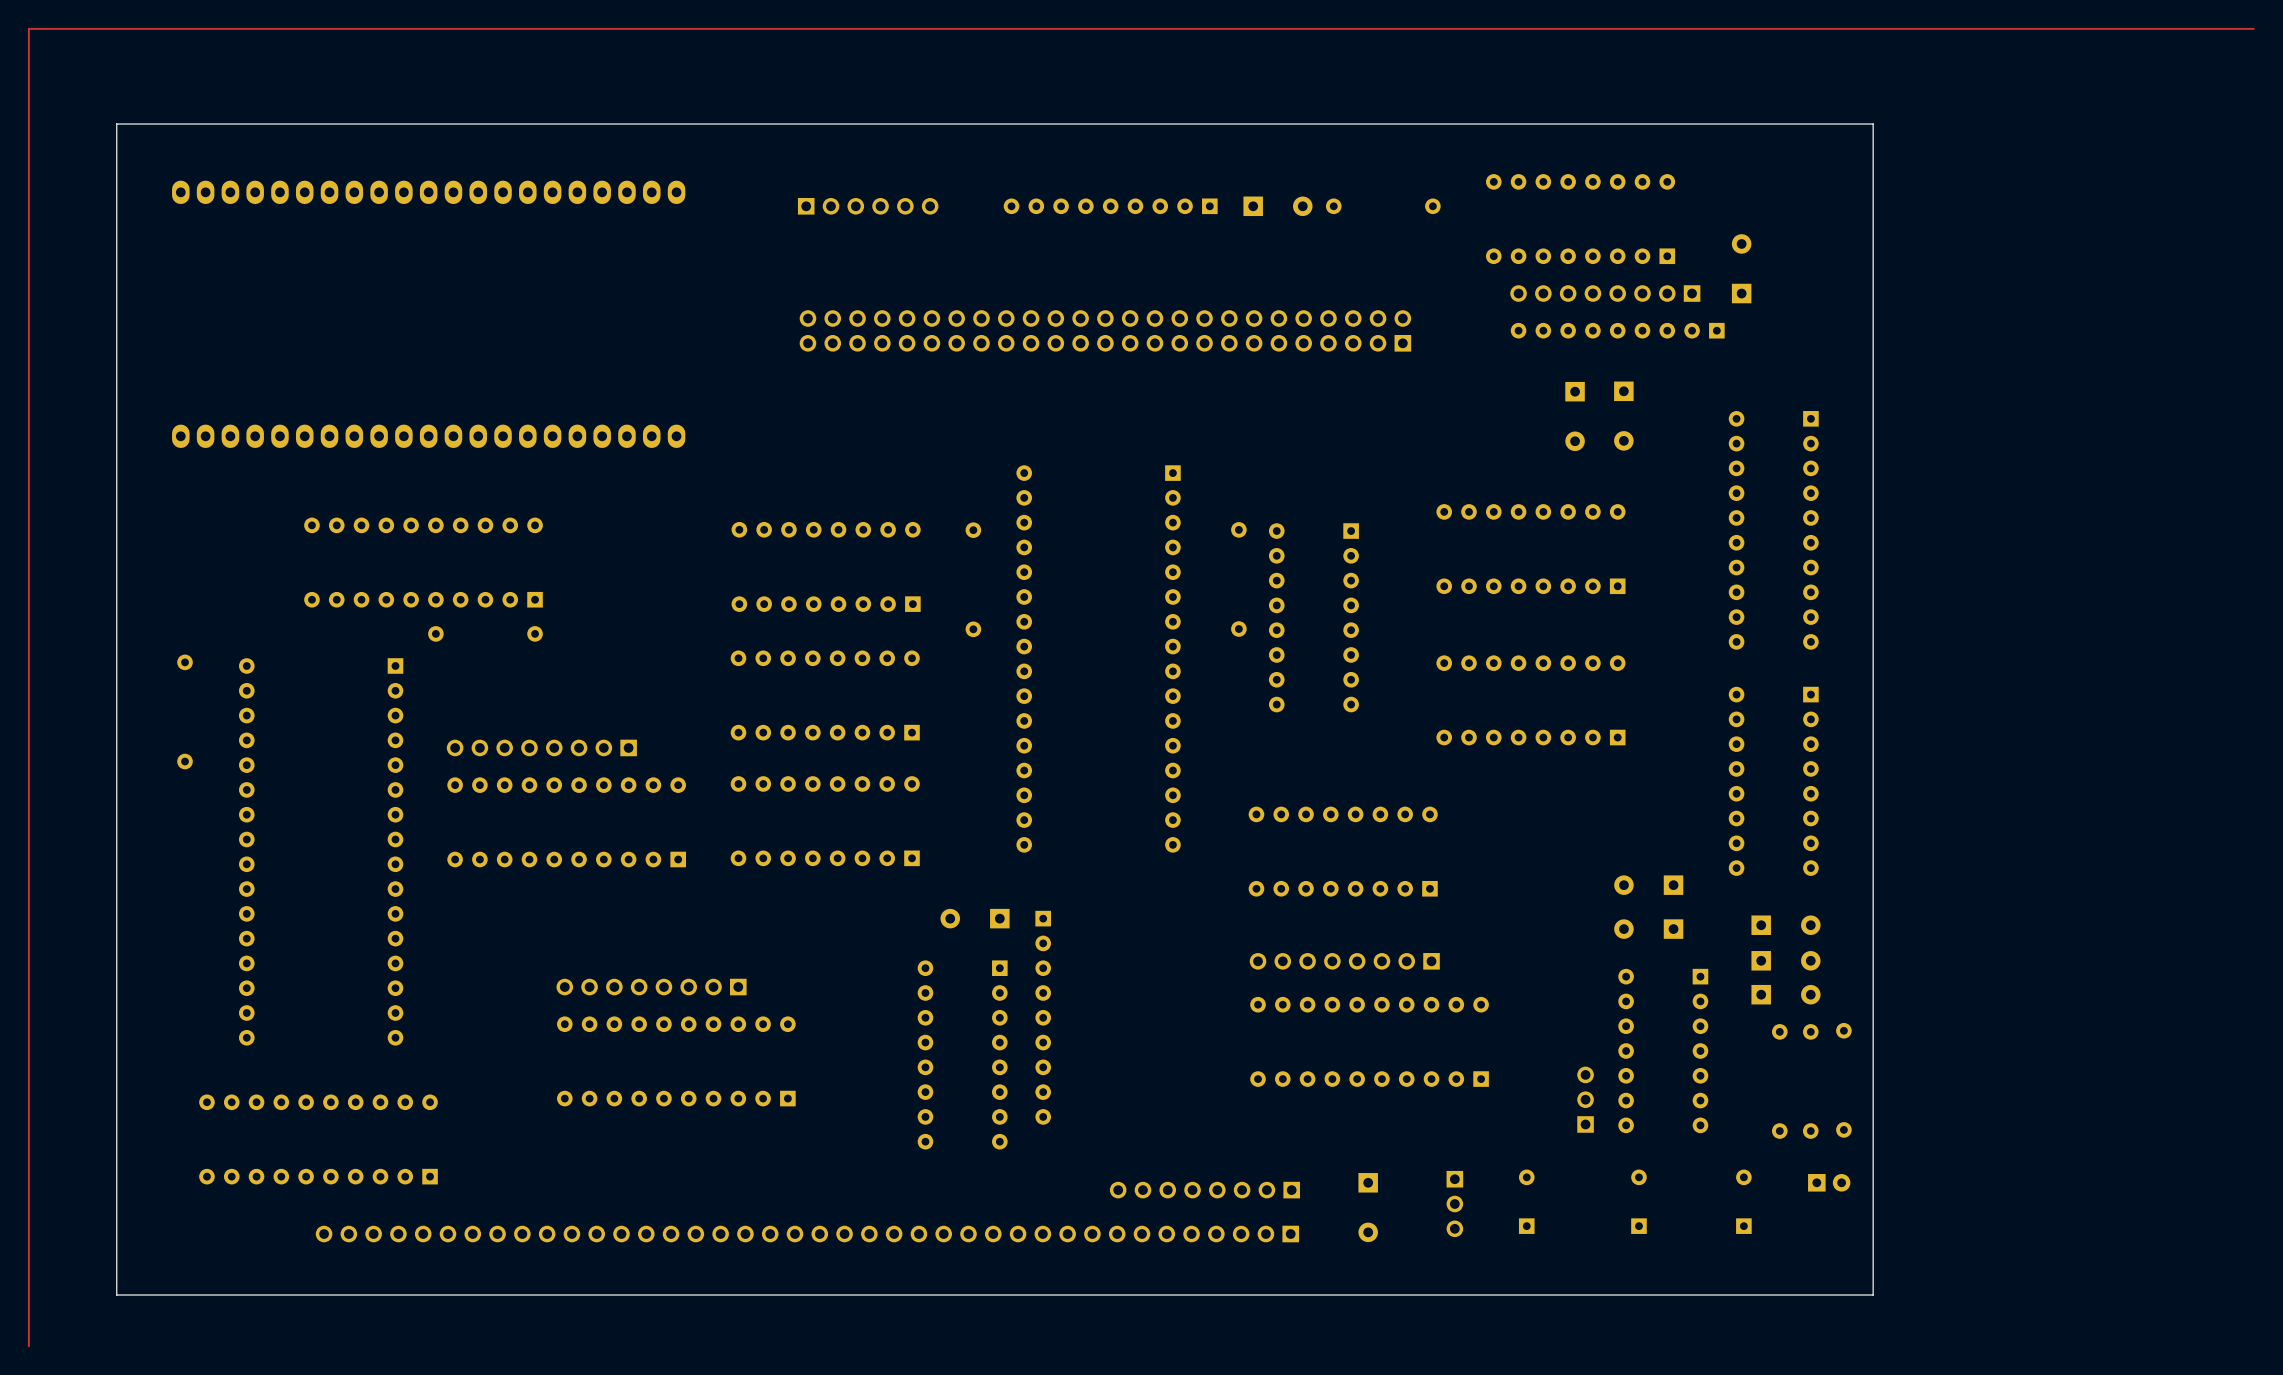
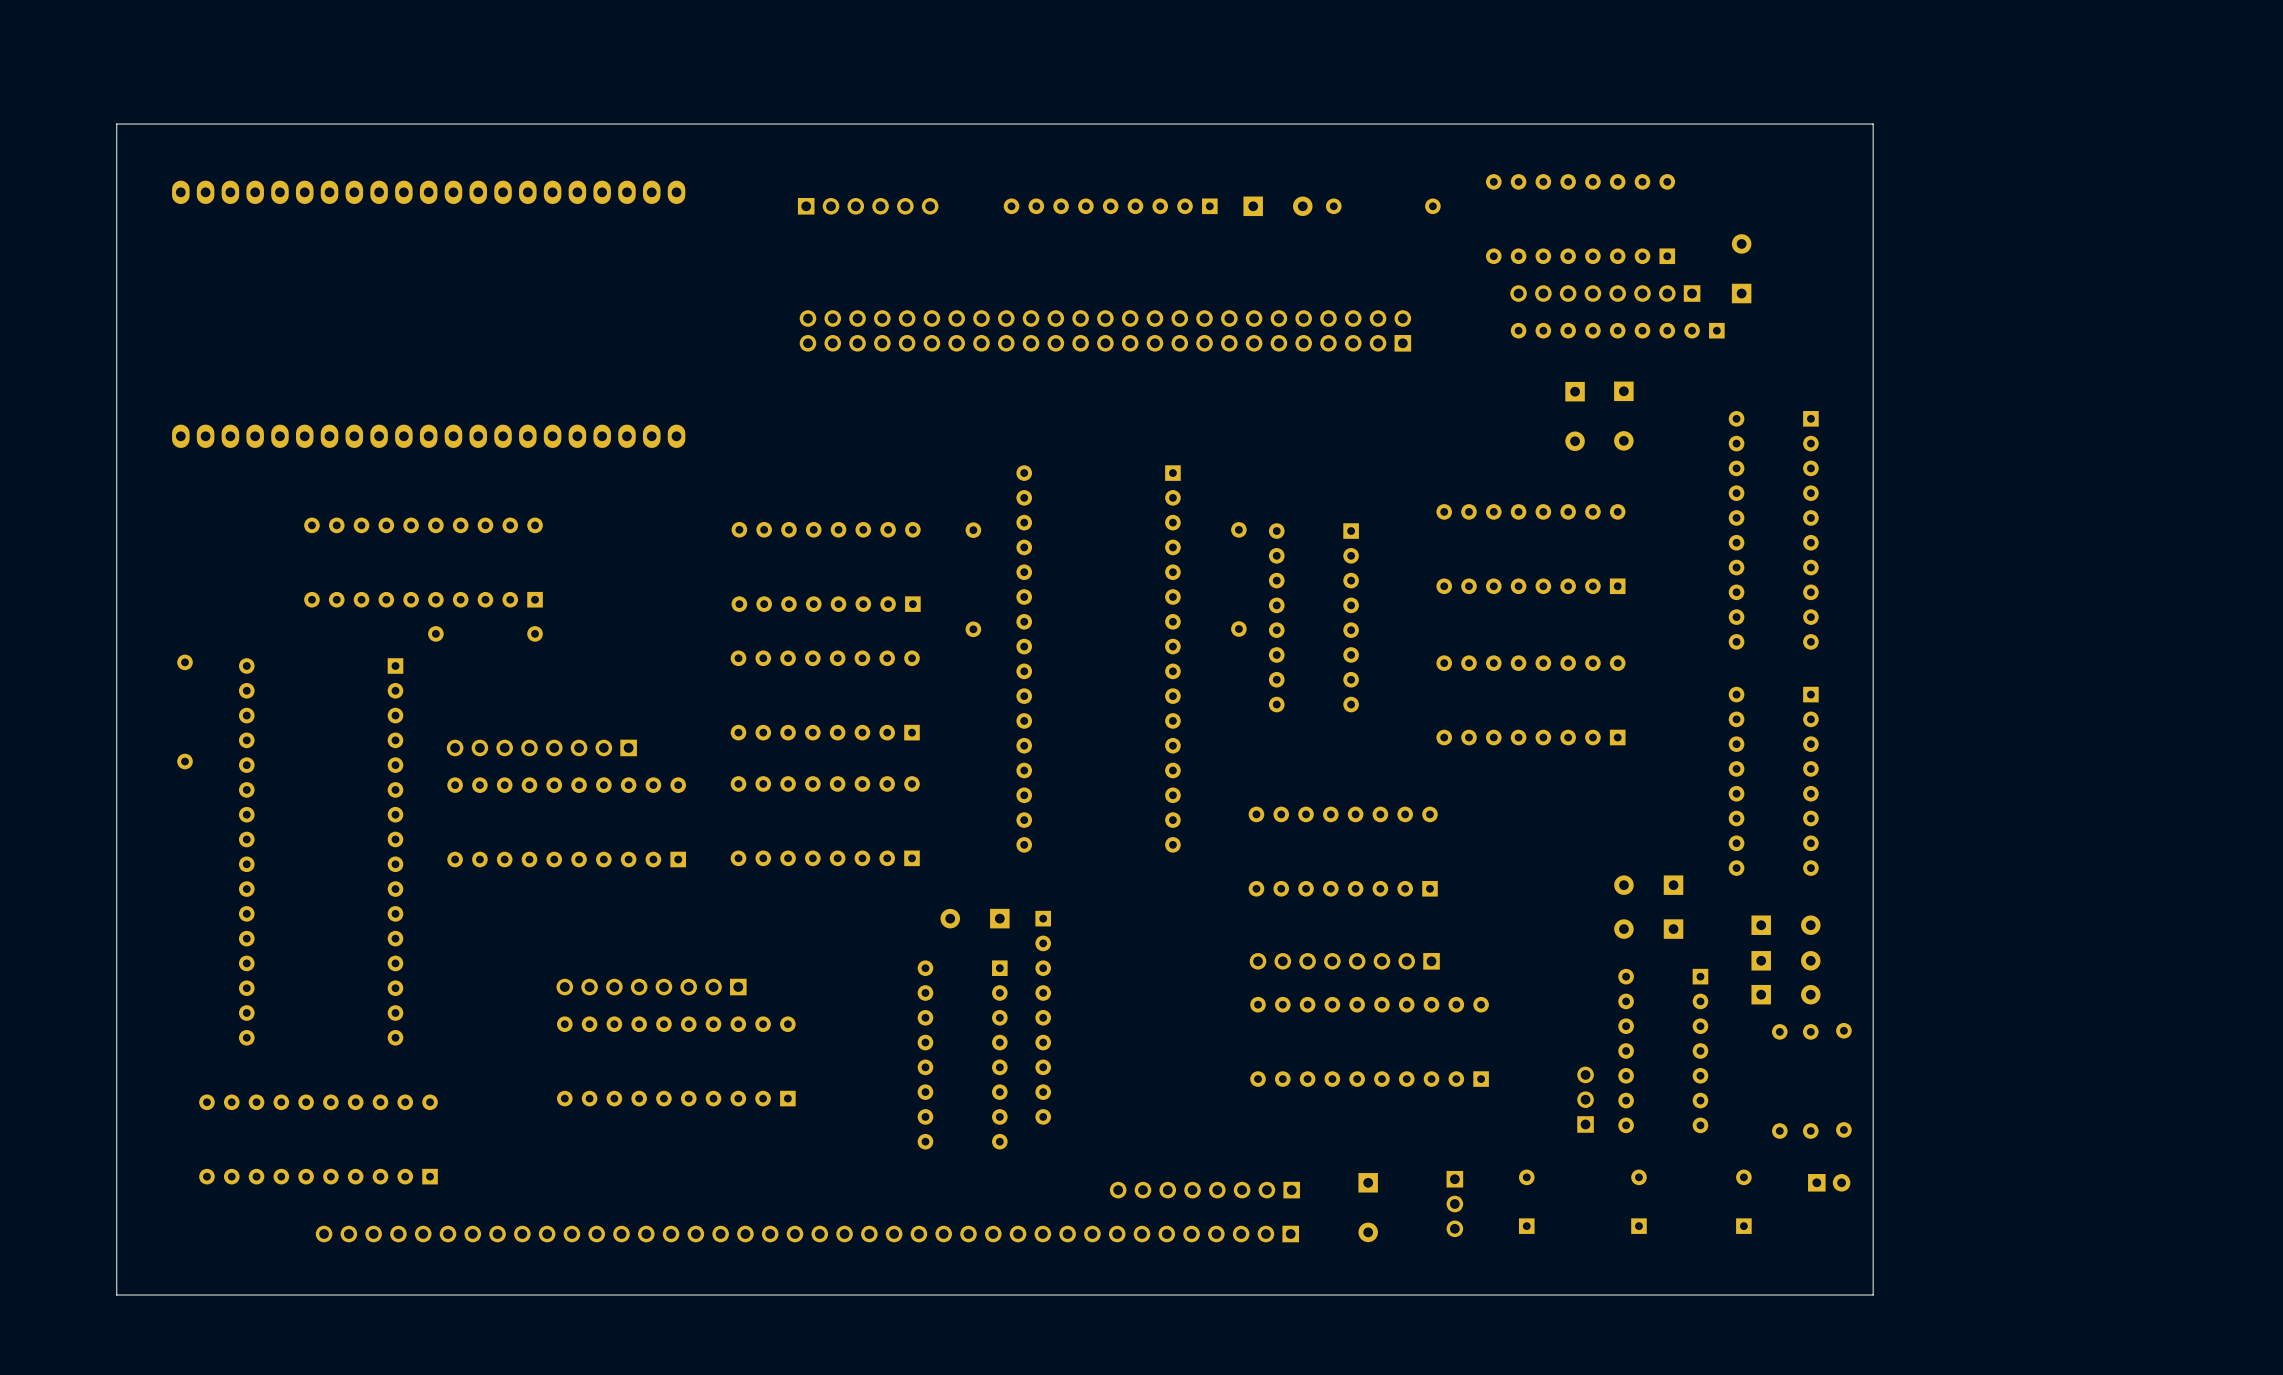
top track: (2253, 28) (28, 28) (28, 1346) -> none

